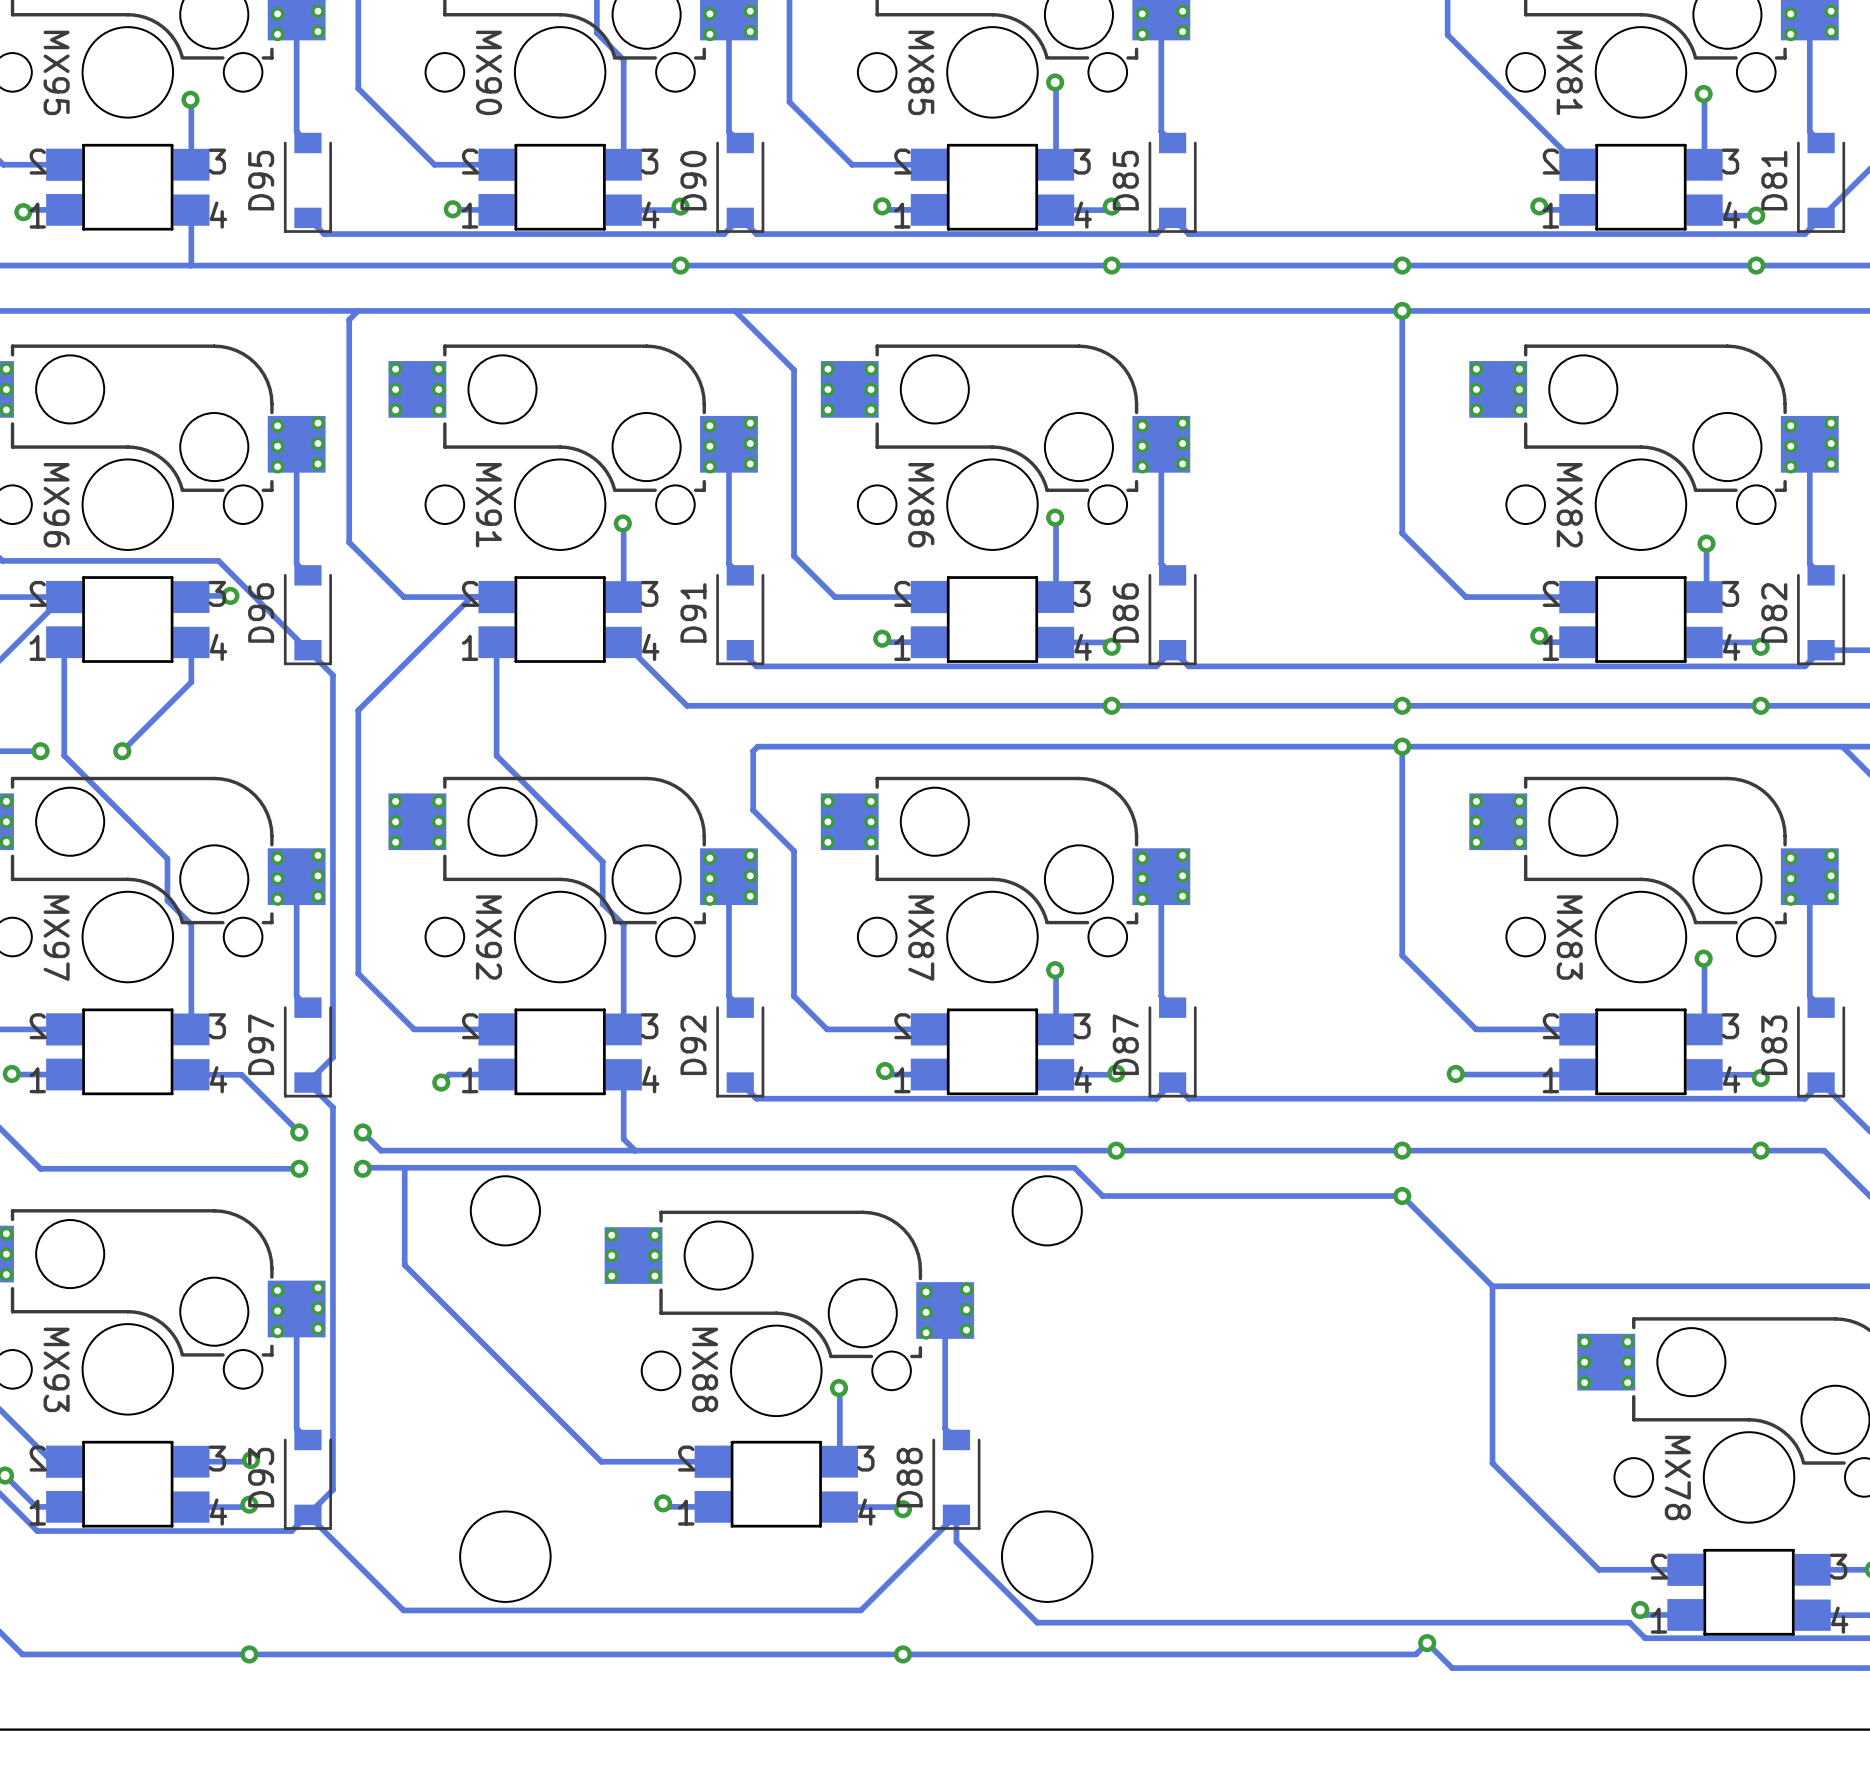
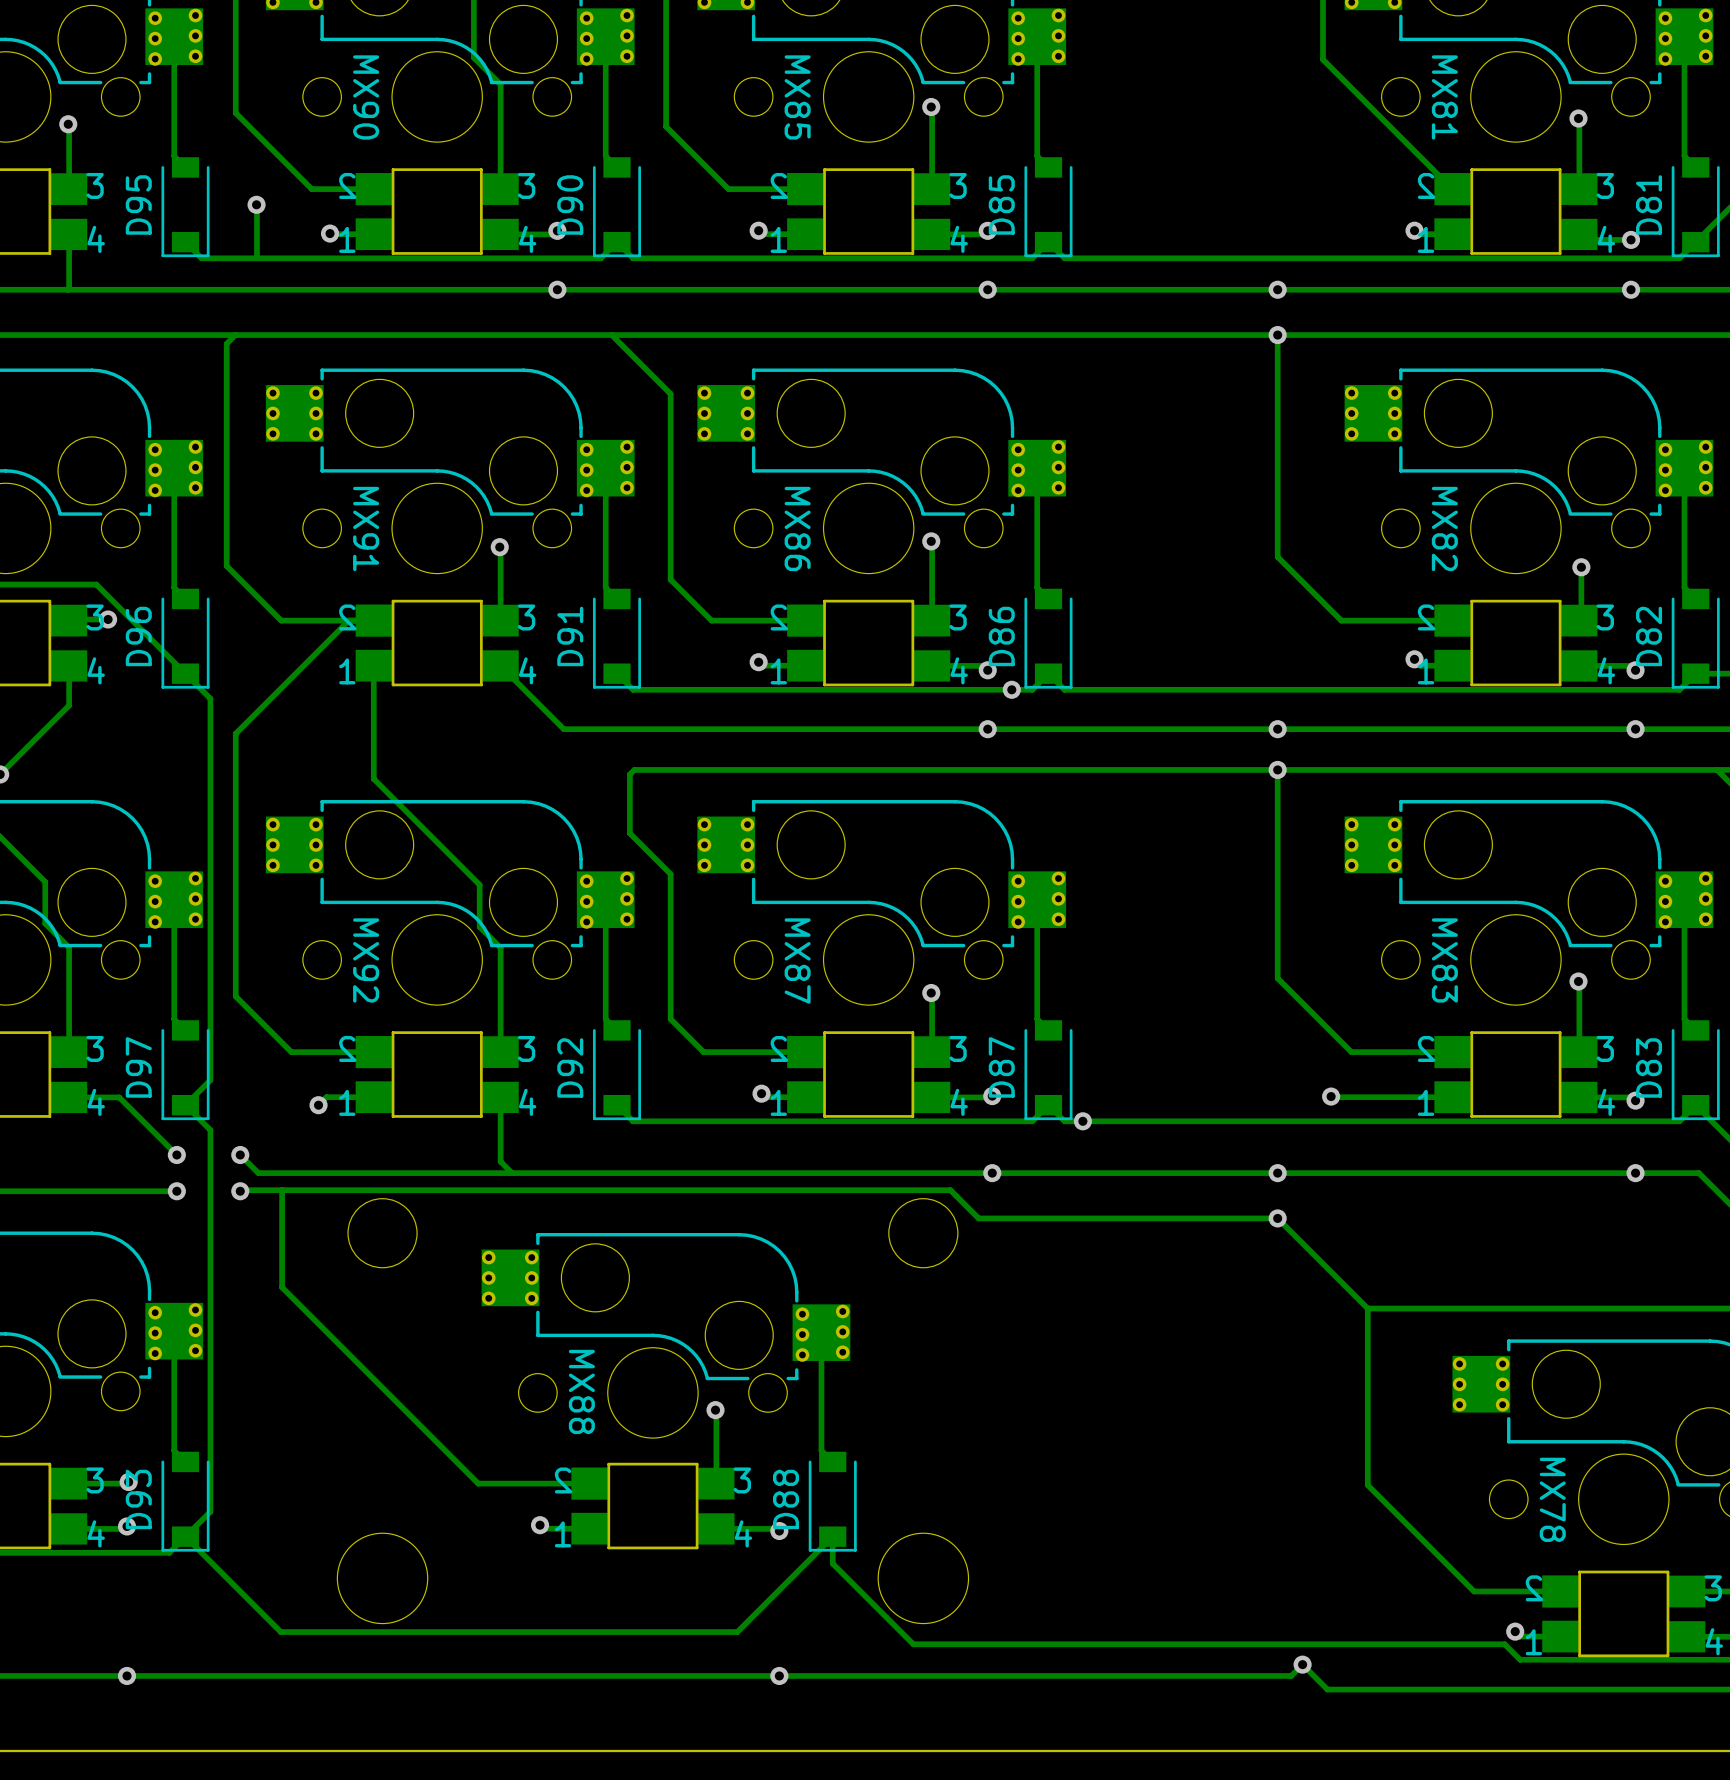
track: none -> (256, 204) (256, 258)
via: none -> (256, 204)
via: none -> (1011, 689)
via: none -> (1082, 1121)

